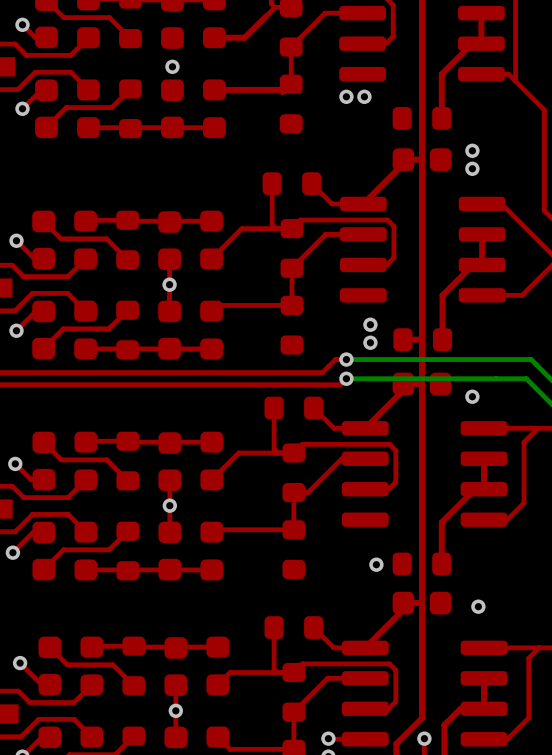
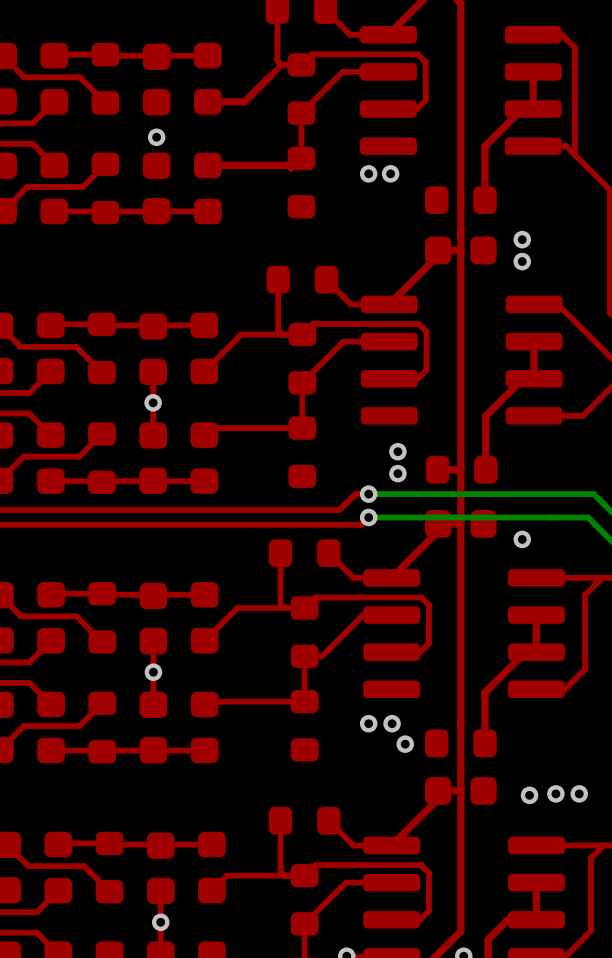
via: none -> (368, 723)
via: none -> (392, 723)
via: none -> (555, 793)
via: none -> (579, 793)

